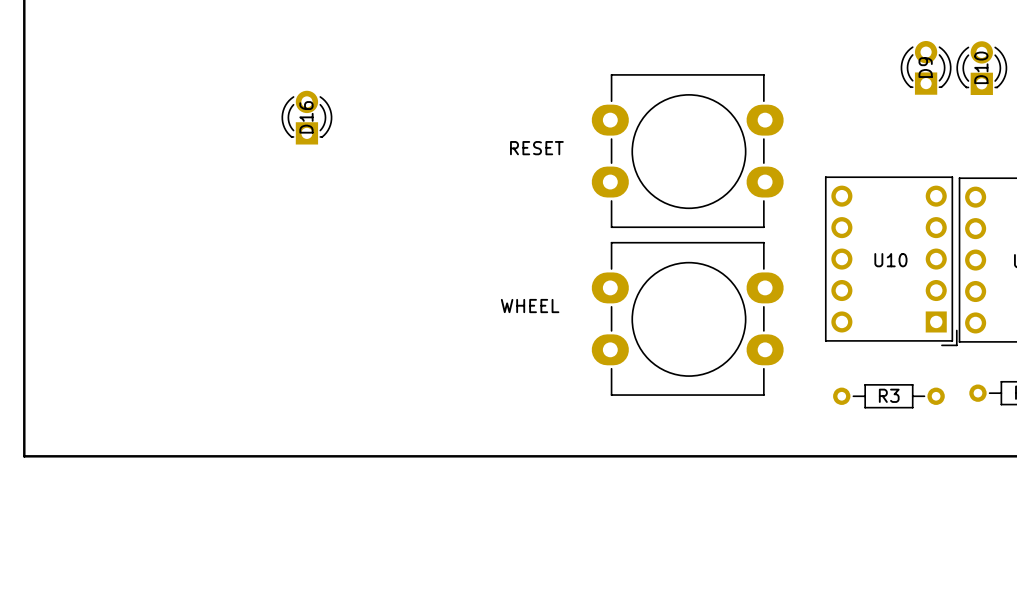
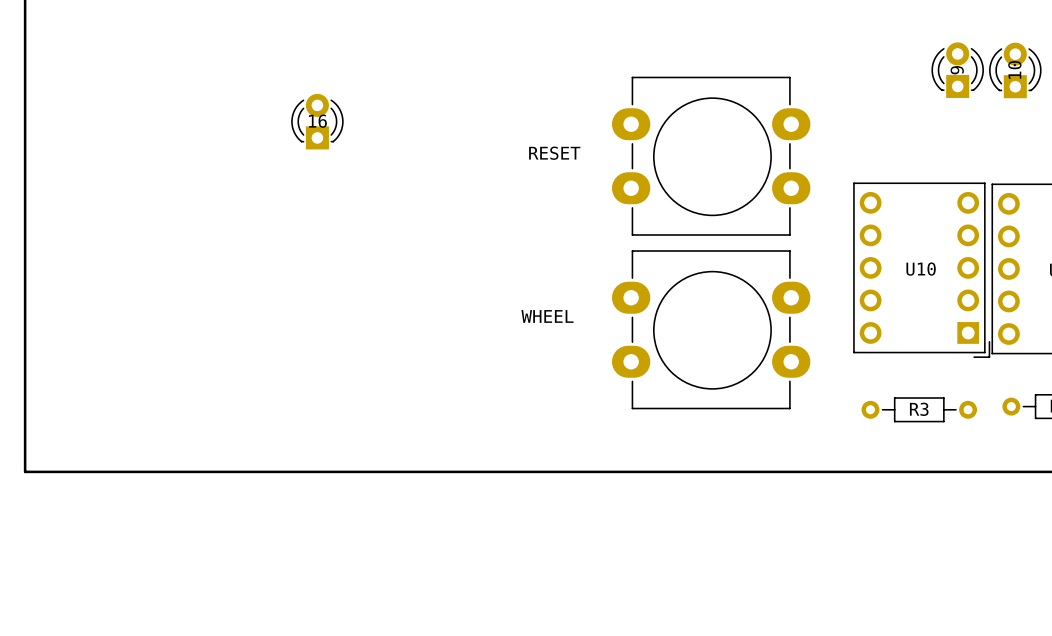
D9 name: D9 (925, 67) -> 9 (957, 70)
D10 name: D10 (981, 67) -> 10 (1014, 69)
D16 name: D16 (306, 117) -> 16 (317, 121)

